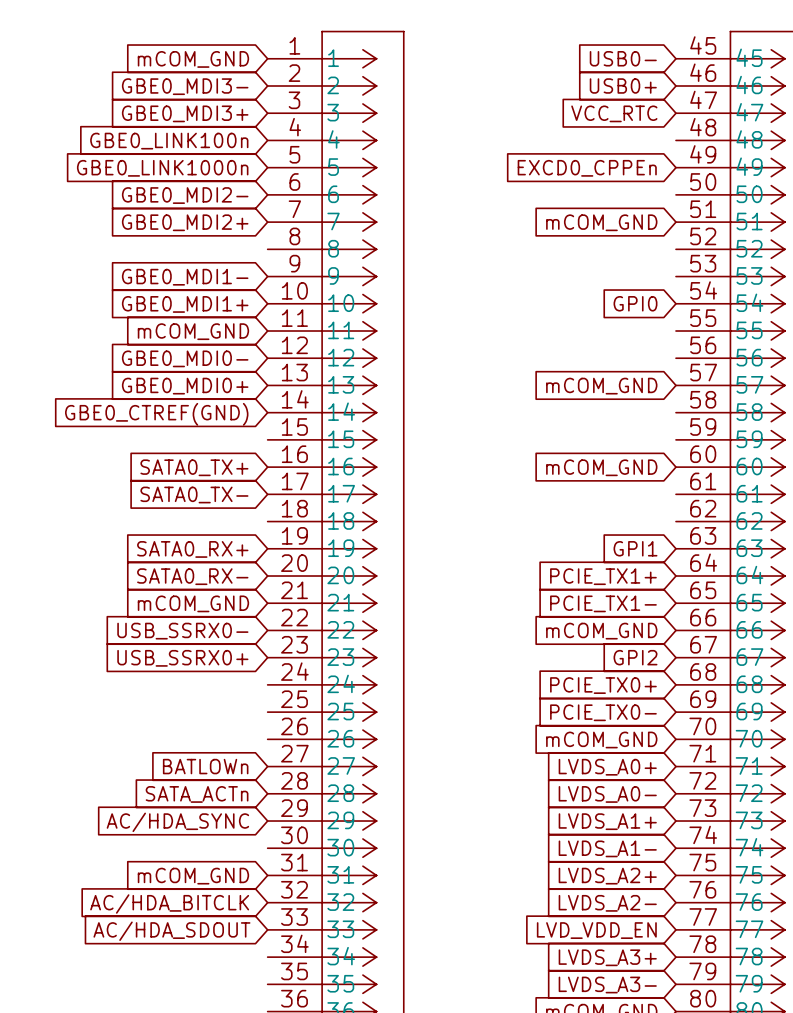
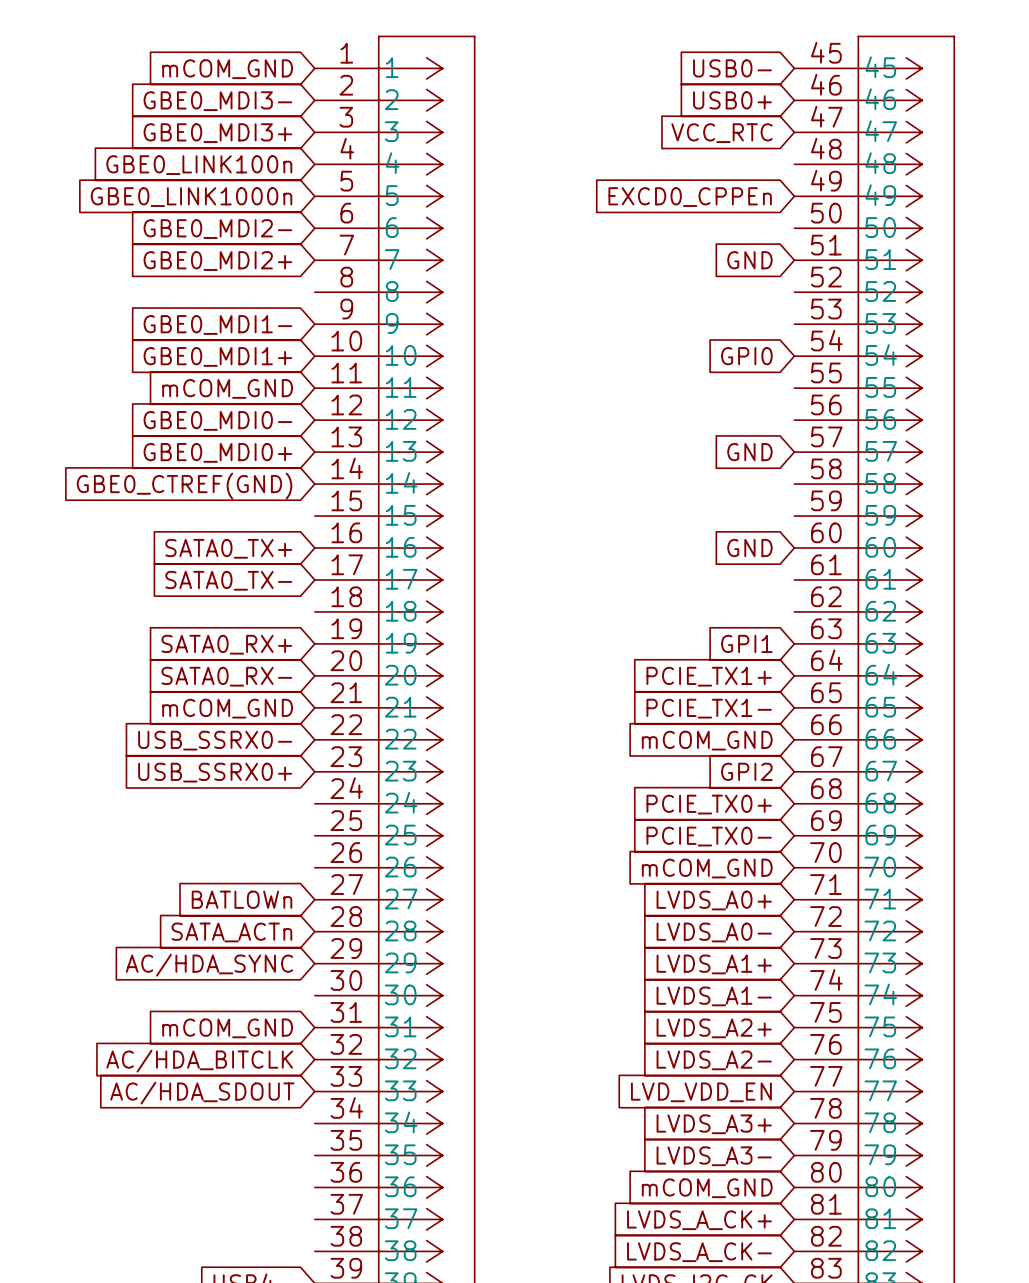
global label: mCOM_GND (601, 222) -> GND (749, 260)
global label: mCOM_GND (601, 386) -> GND (749, 452)
global label: mCOM_GND (601, 467) -> GND (749, 548)

